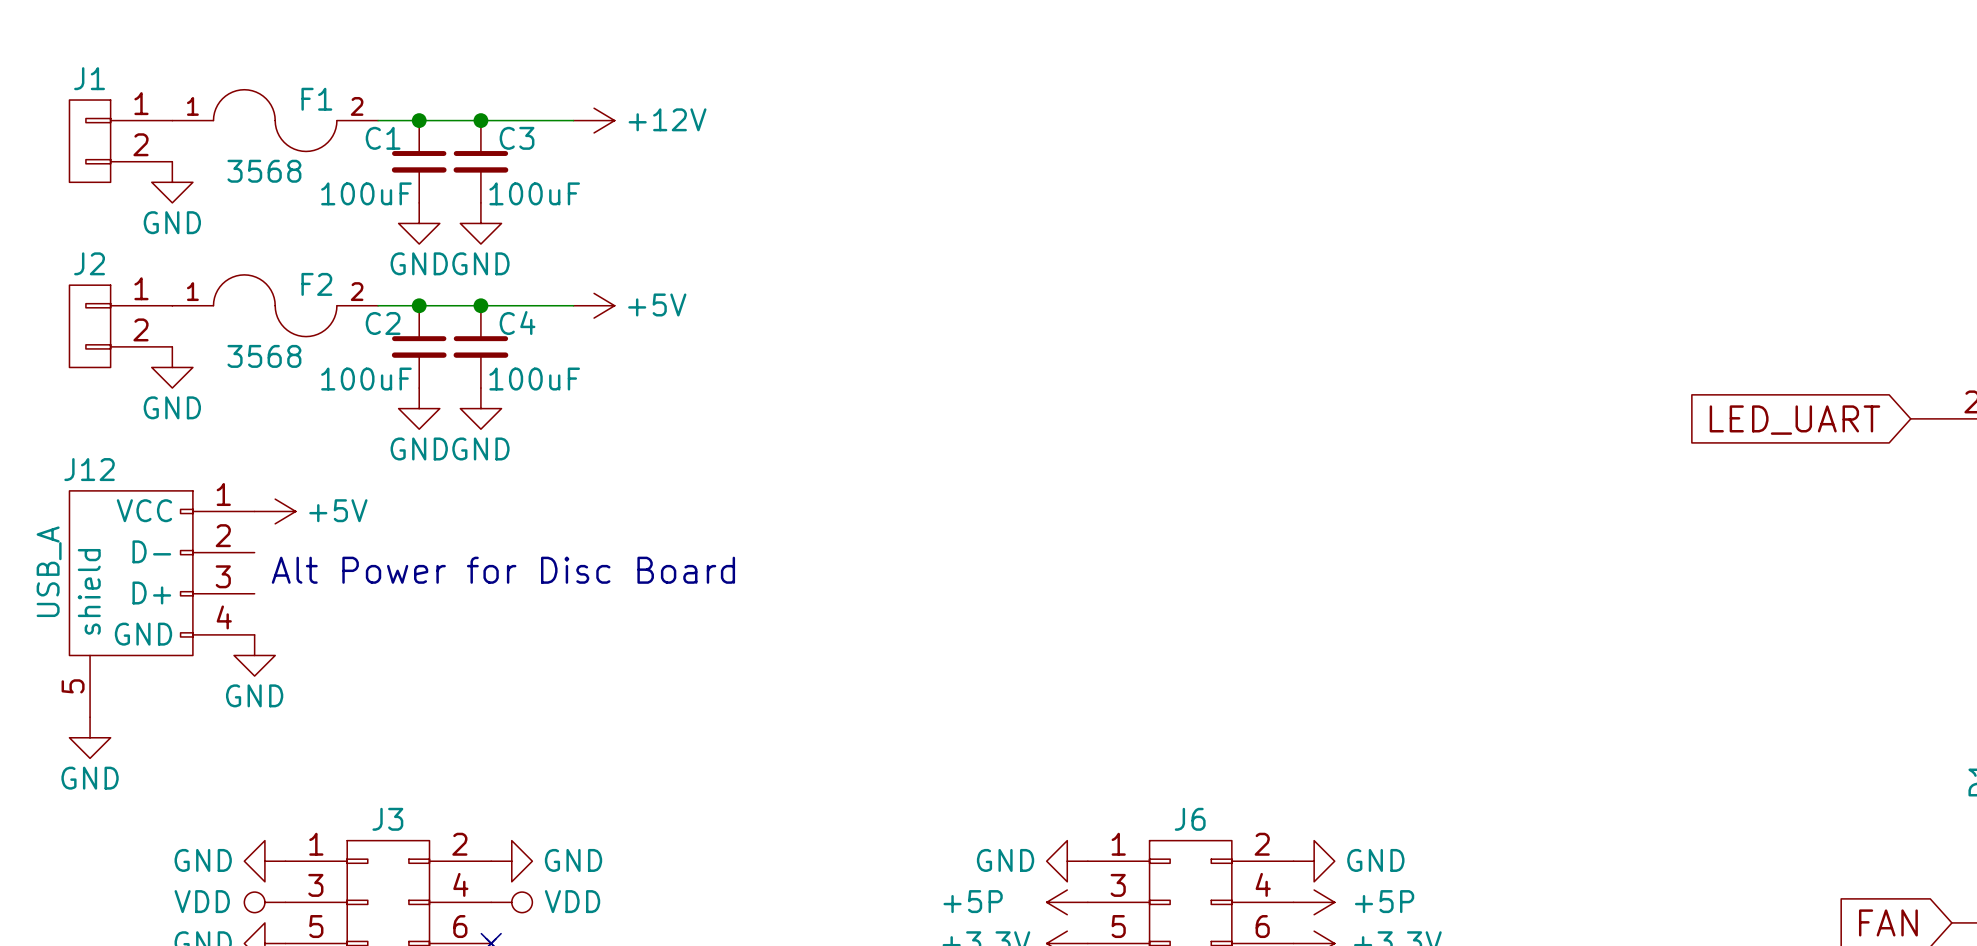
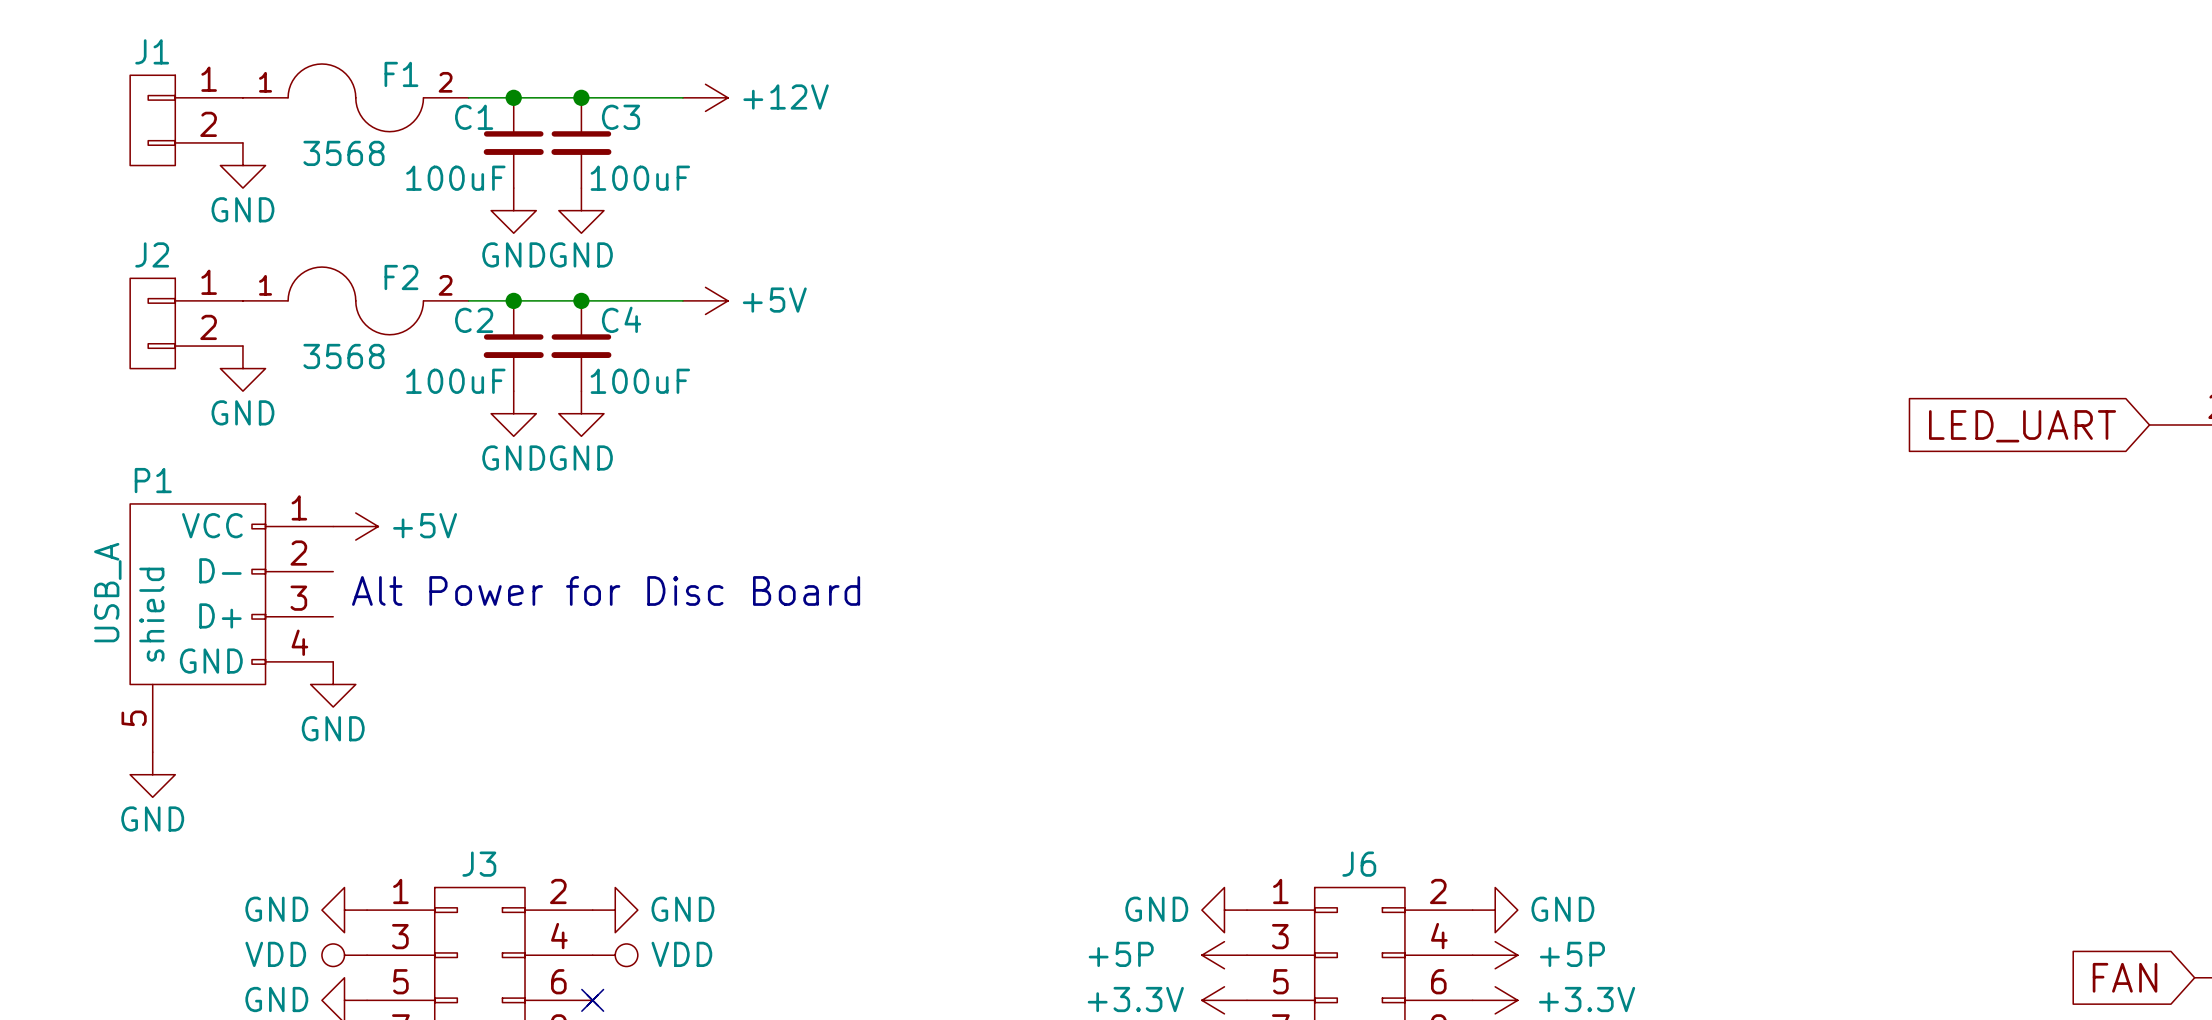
J12 name: J12 (89, 469) -> P1 (153, 480)

